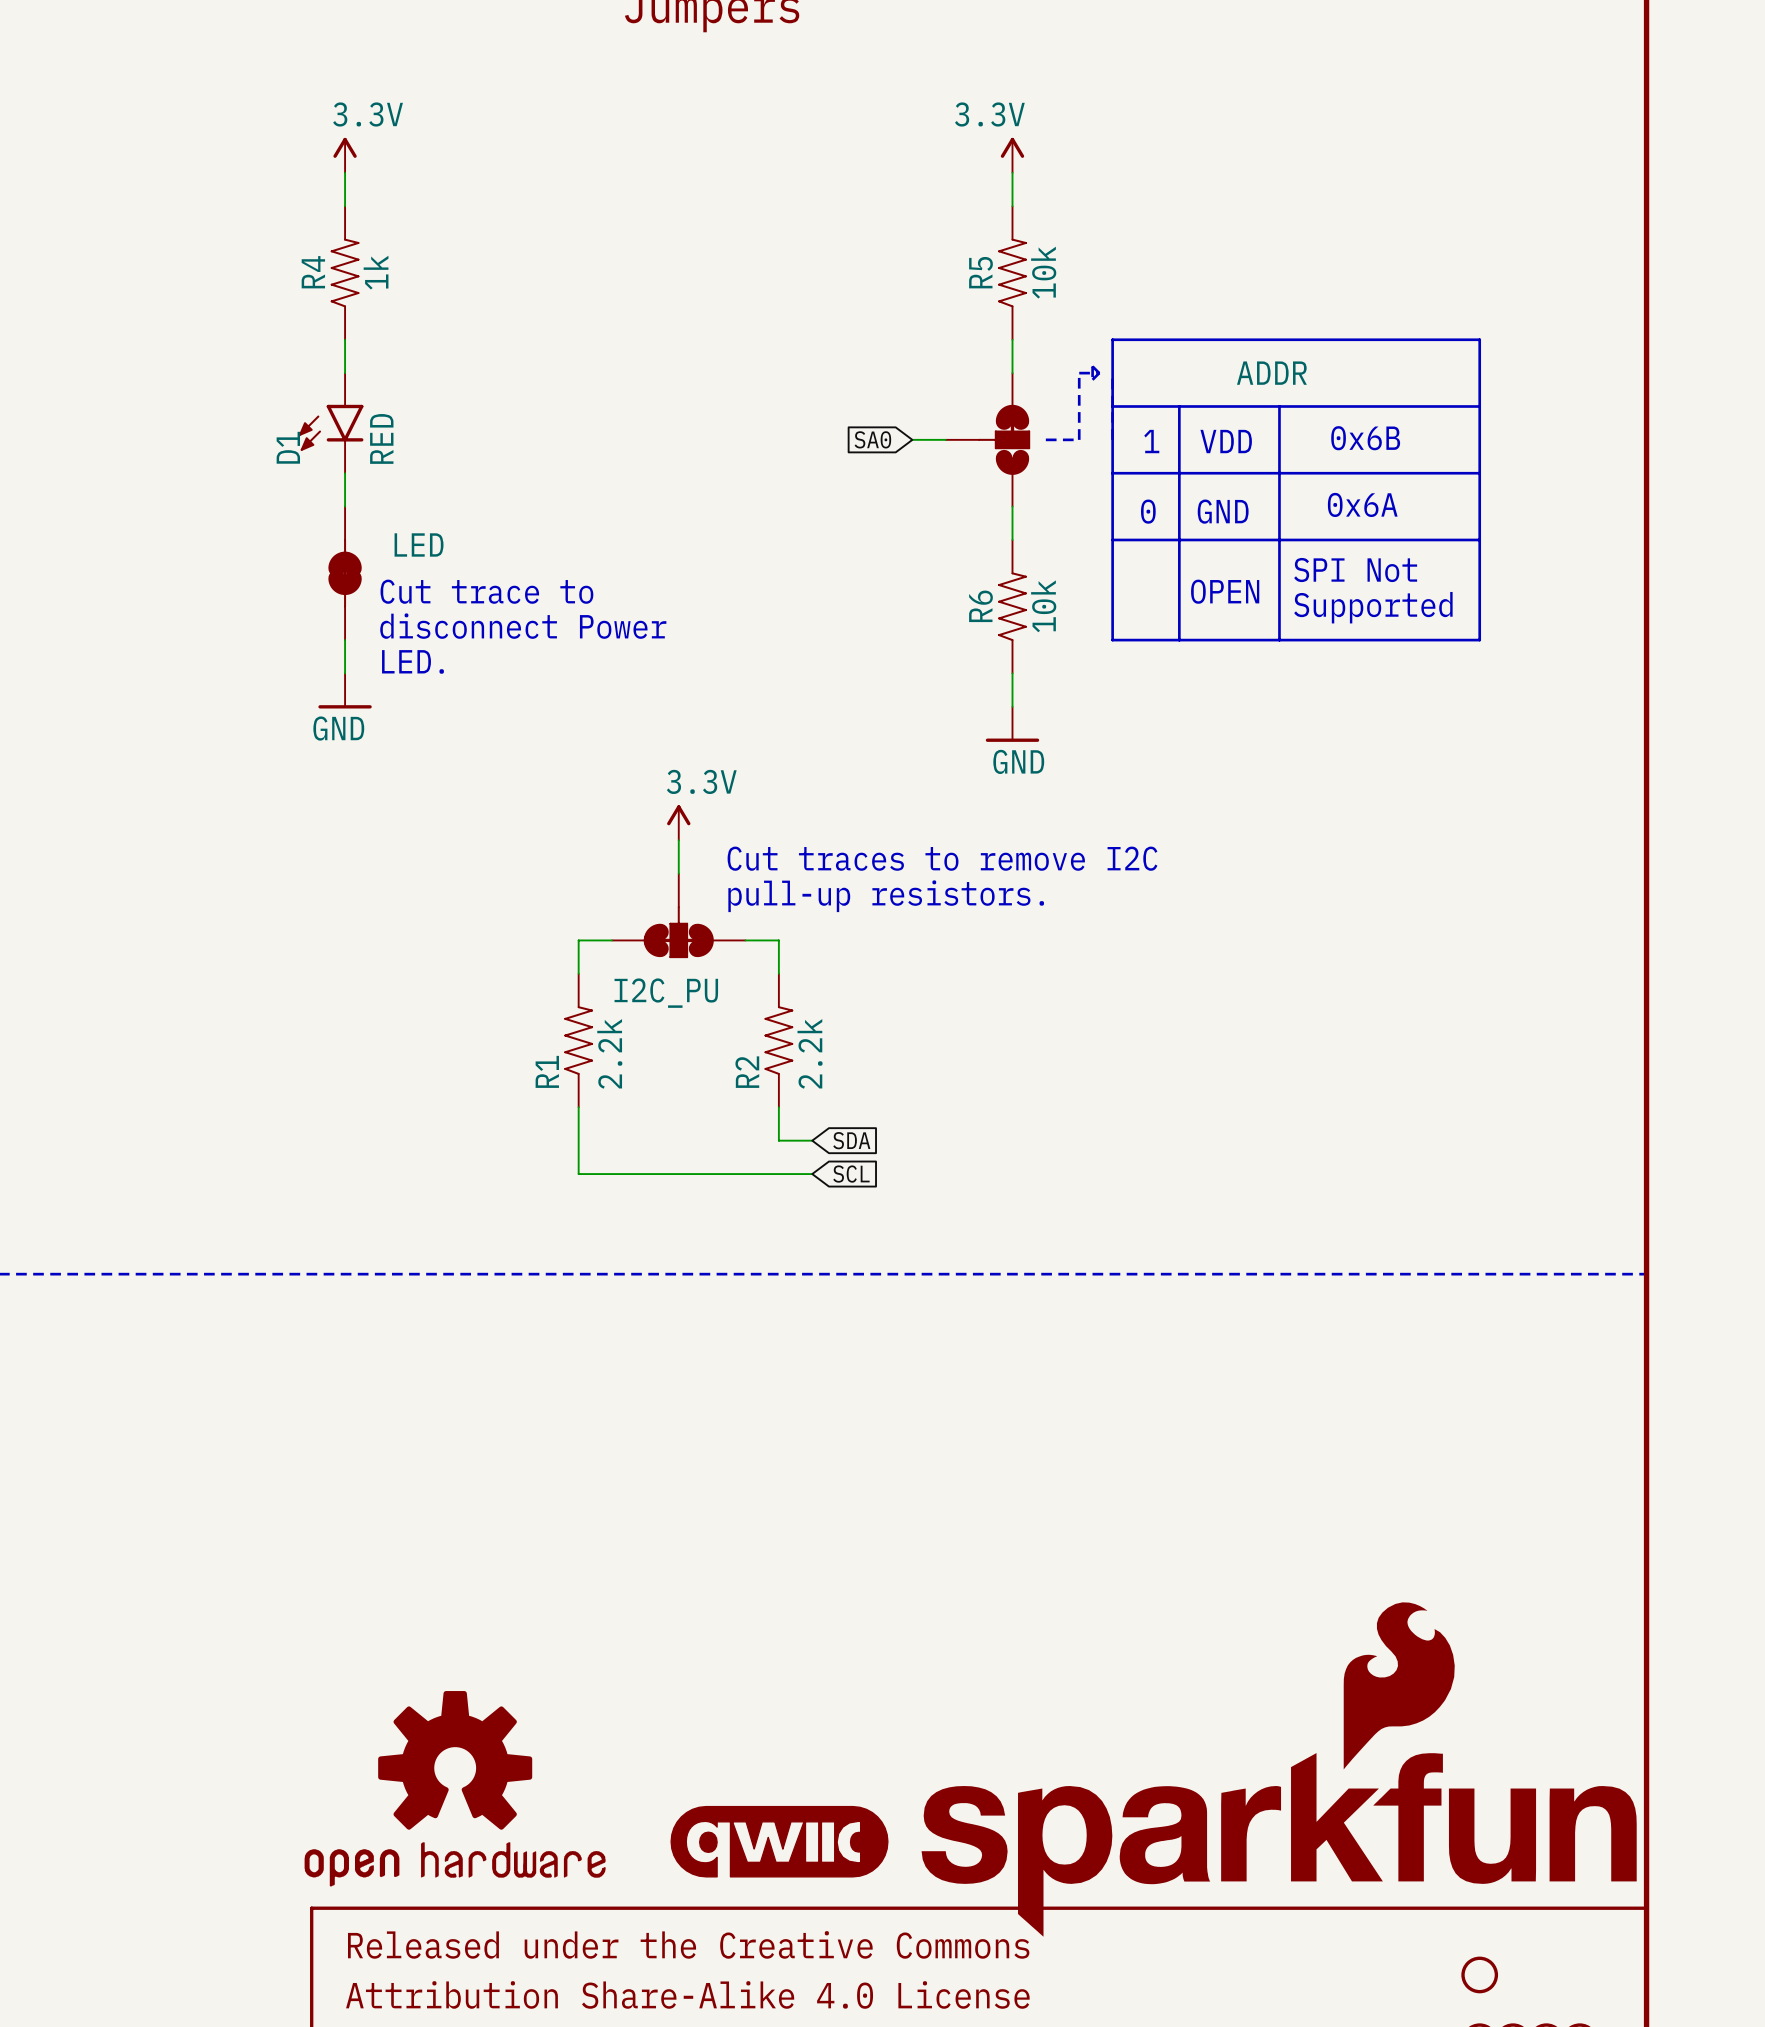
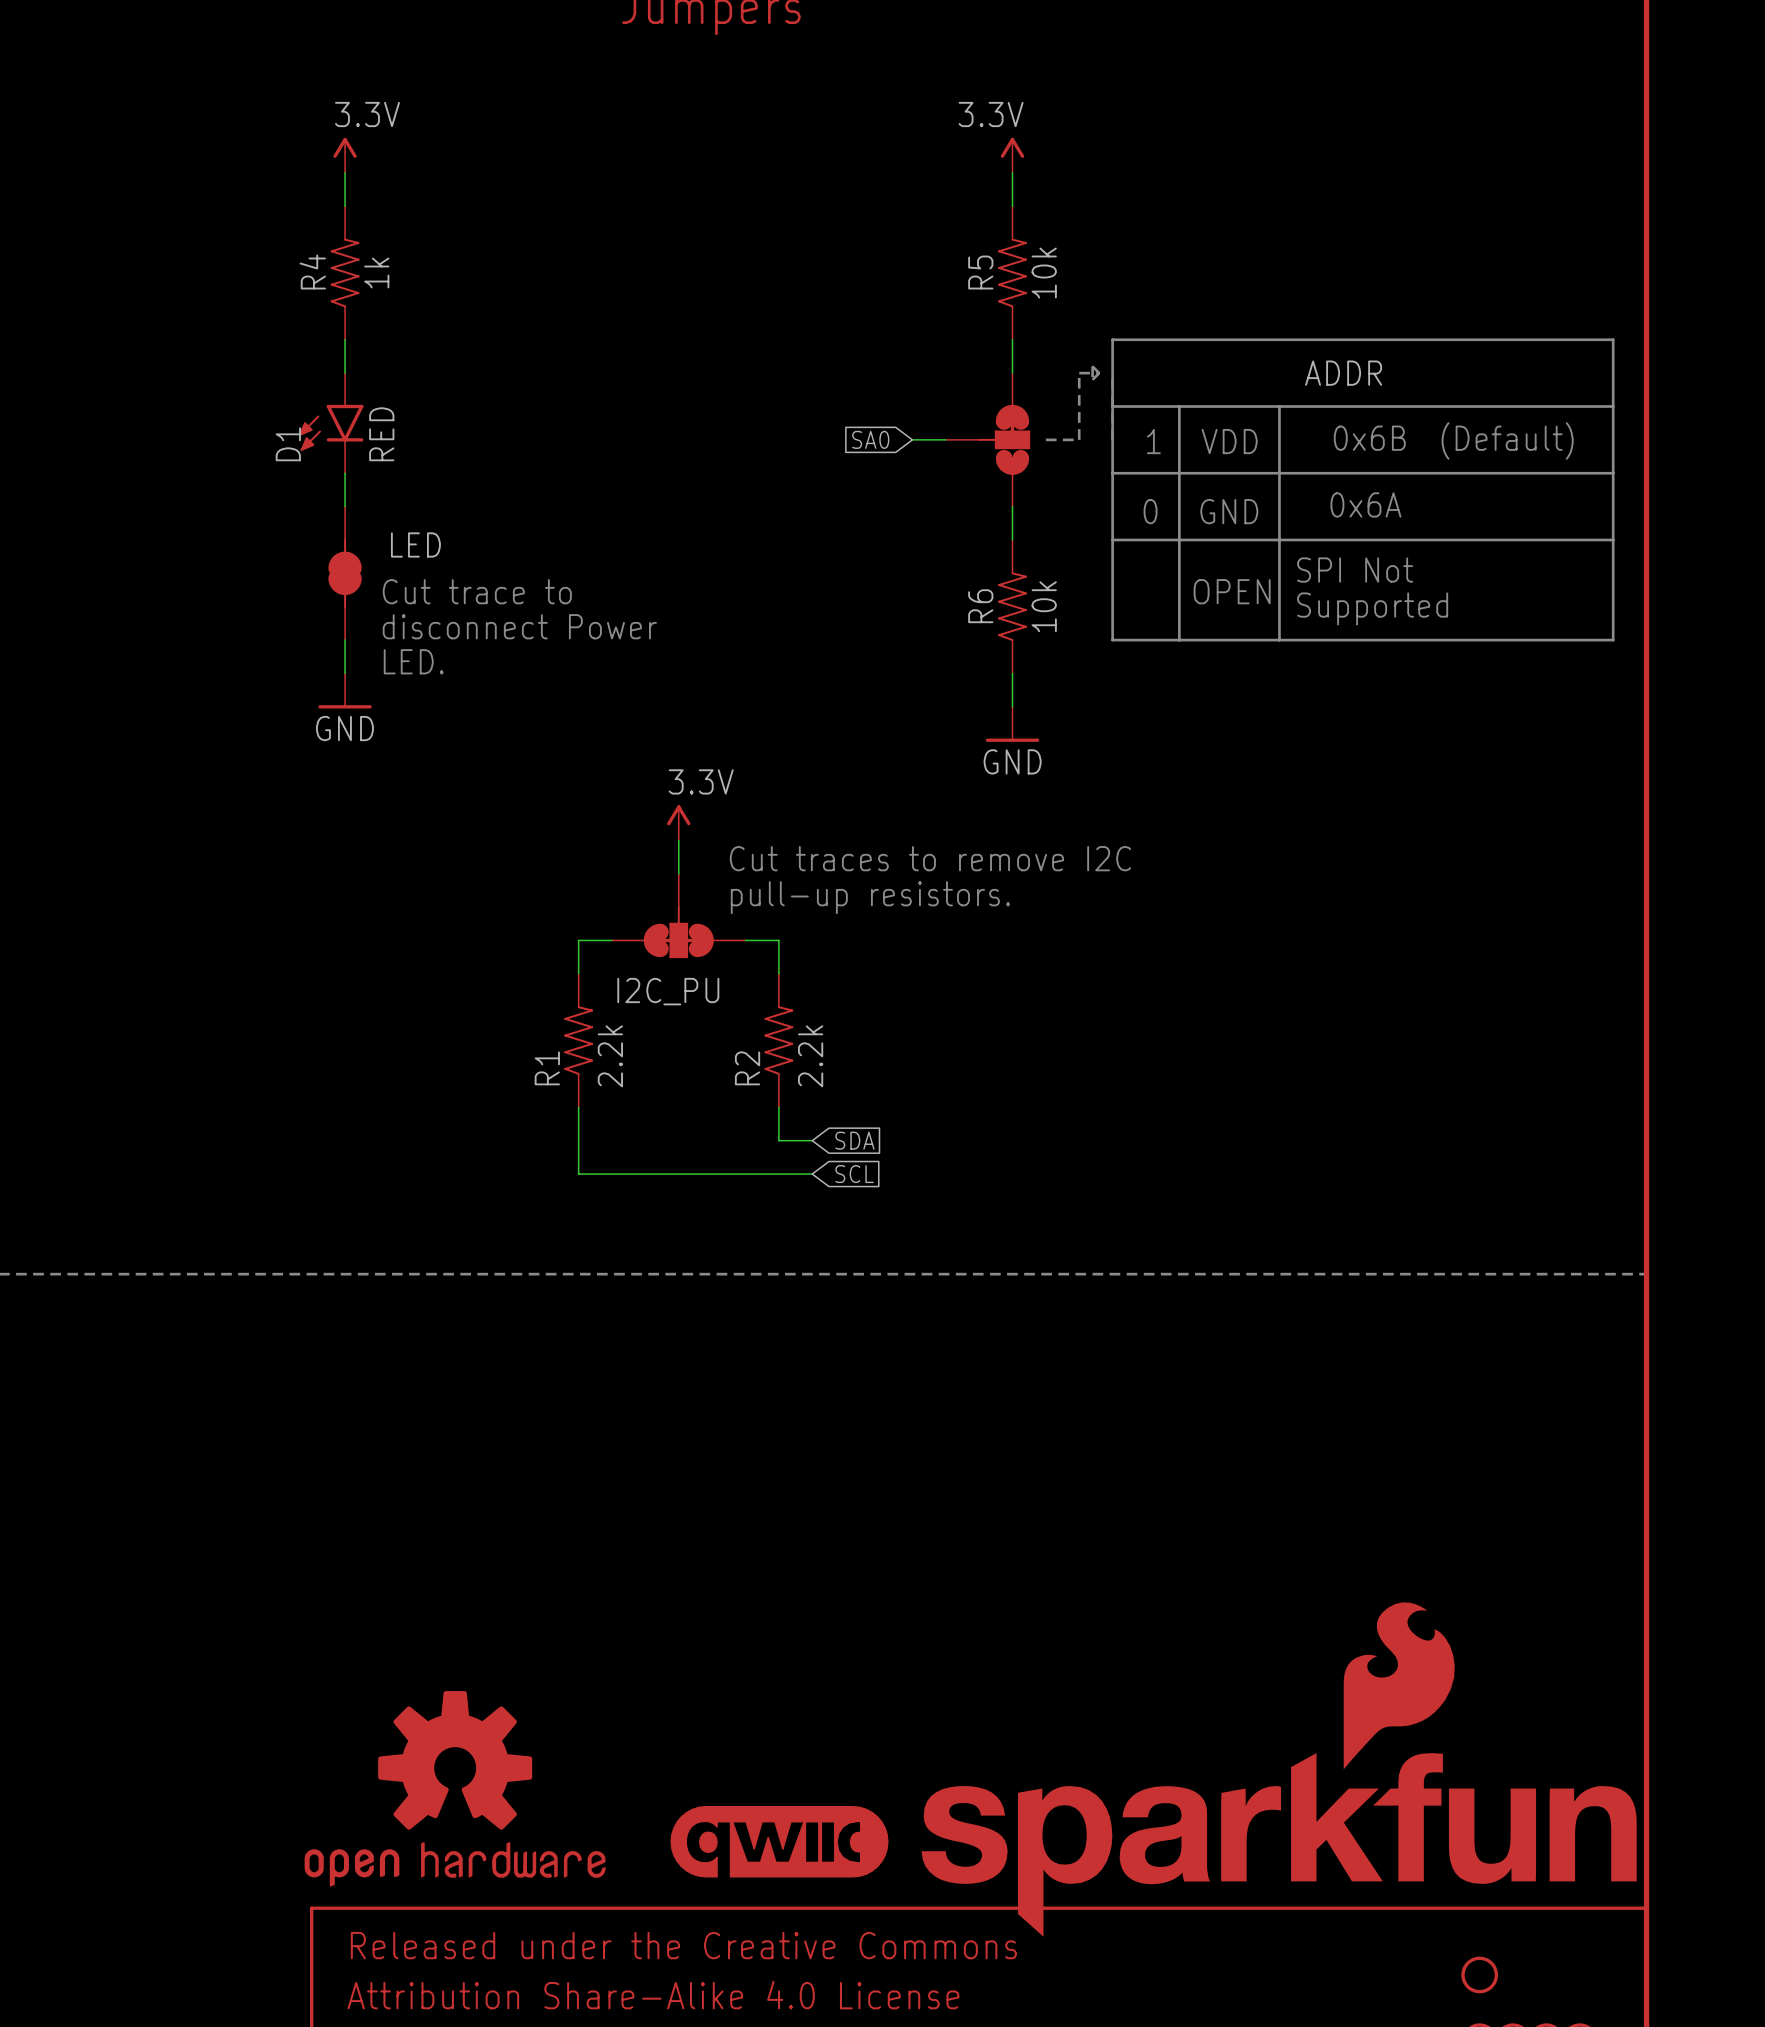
line: (1479, 339) (1479, 640) -> (1479, 339) (1613, 339) (1613, 640) (1479, 640)
ADDR name position: ADDR (1271, 373) -> ADDR (1343, 373)
line: none -> (1479, 406) (1613, 406)
text: none -> (Default) (1507, 440)
line: none -> (1479, 473) (1613, 473)
line: none -> (1479, 539) (1613, 539)

